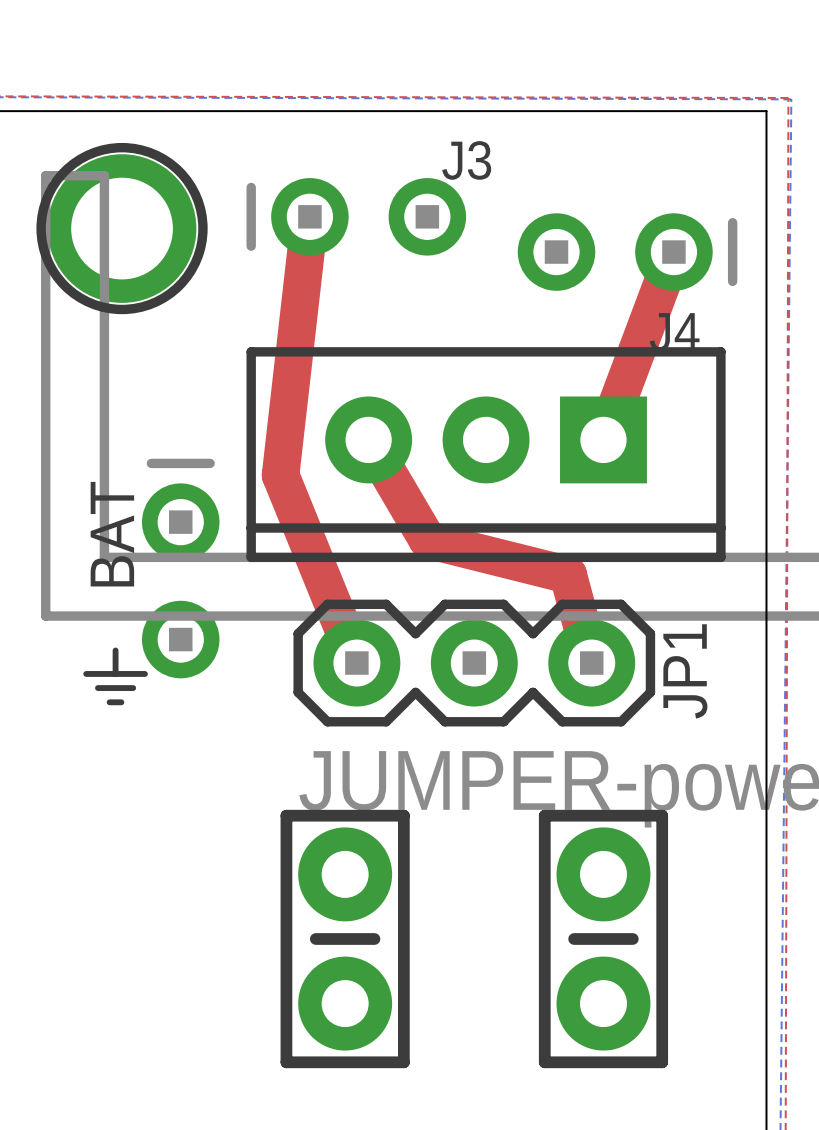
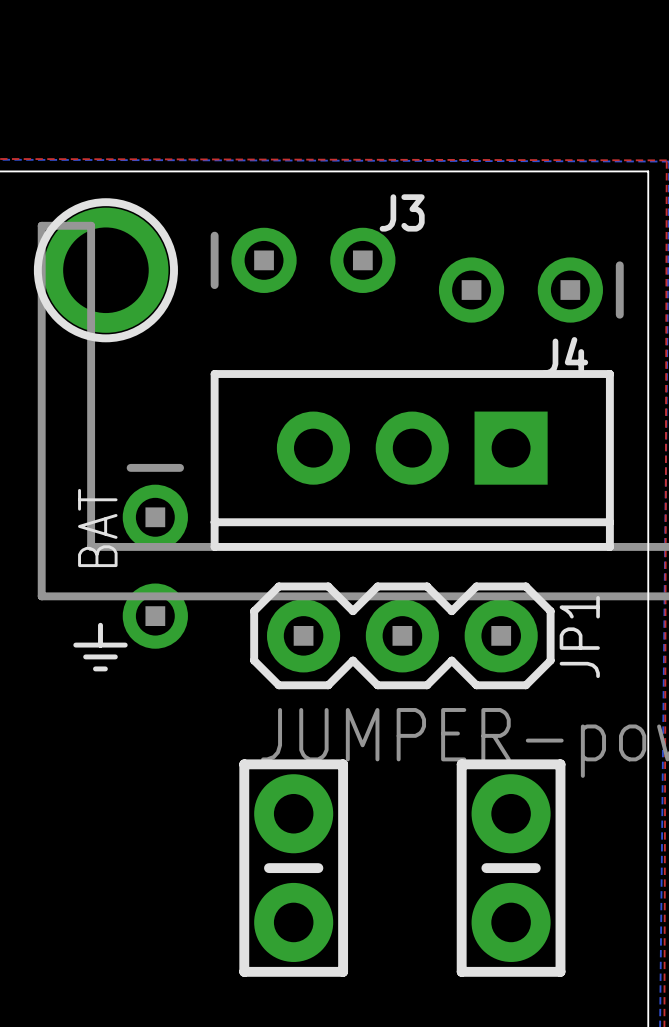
top track: (309, 216) (280, 475) (356, 663) -> none
top track: (673, 252) (603, 439) -> none
top track: (368, 439) (427, 539) (568, 574) (591, 663) -> none

